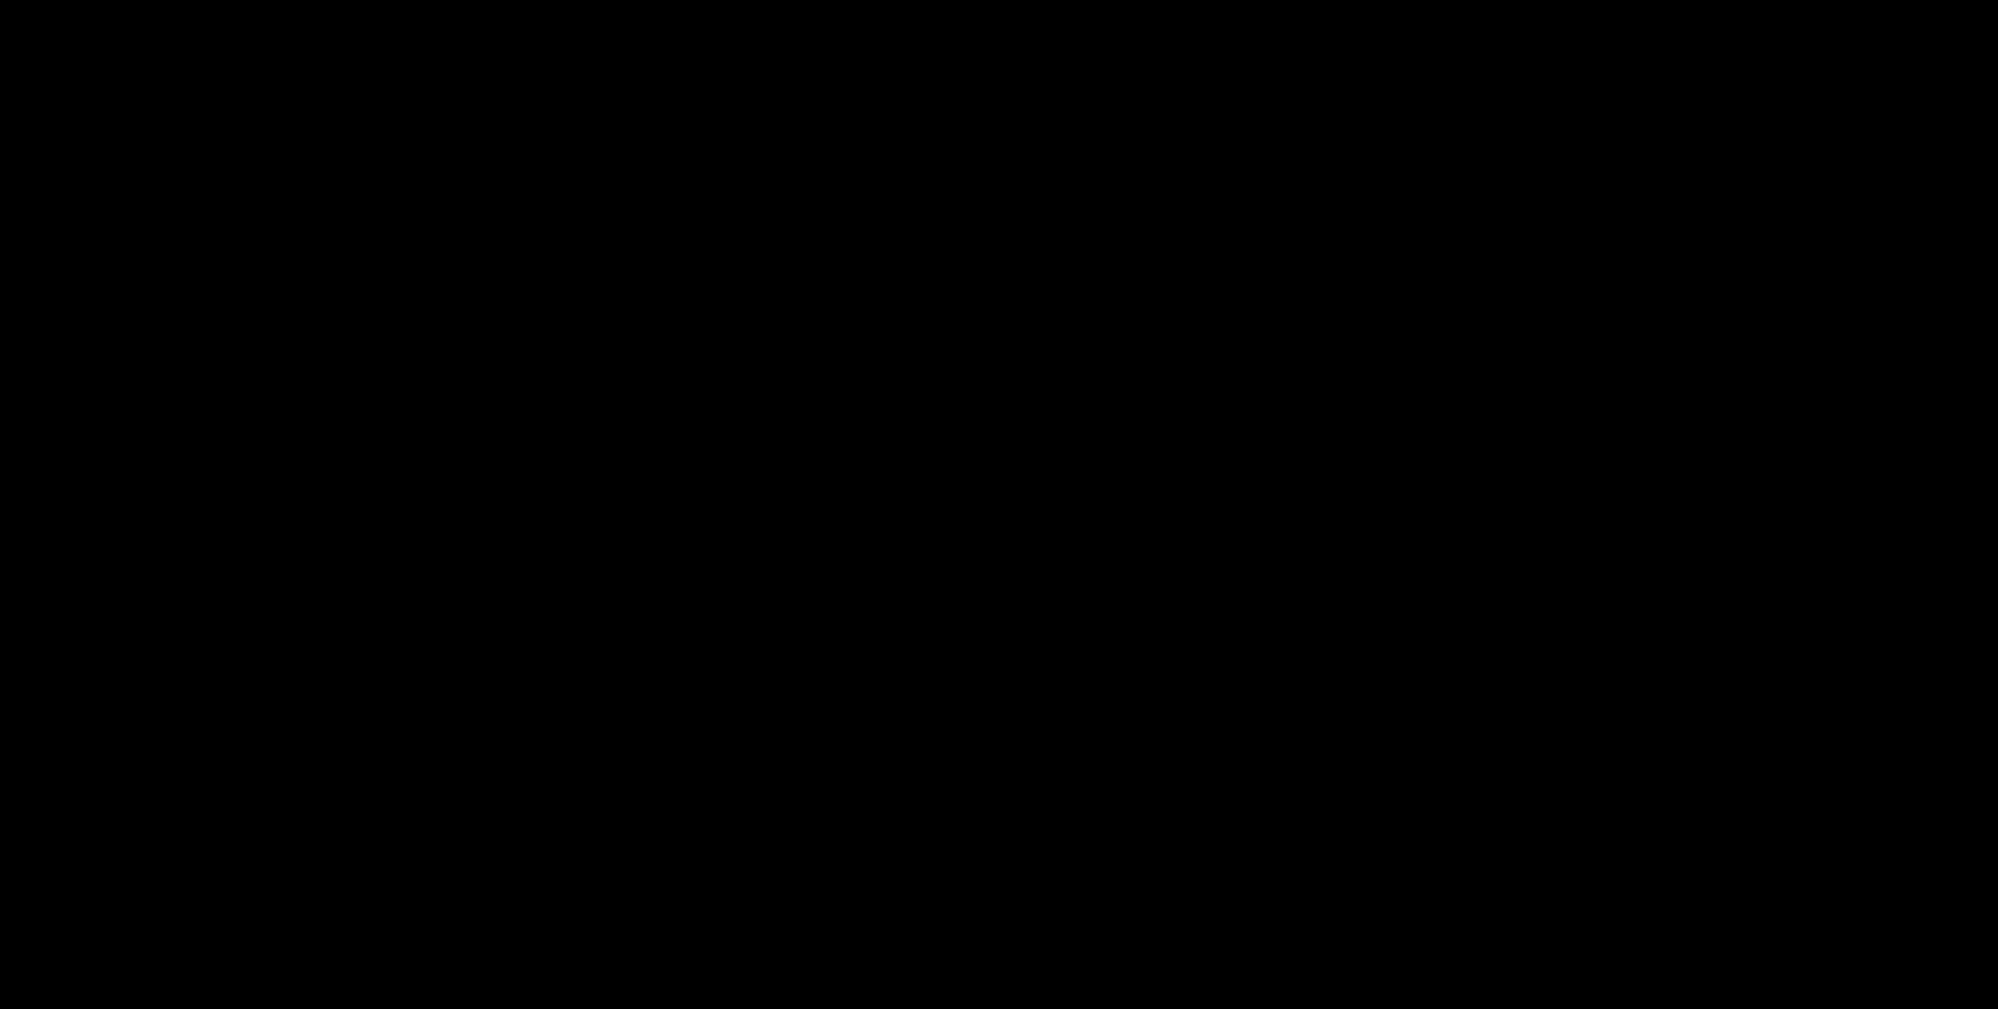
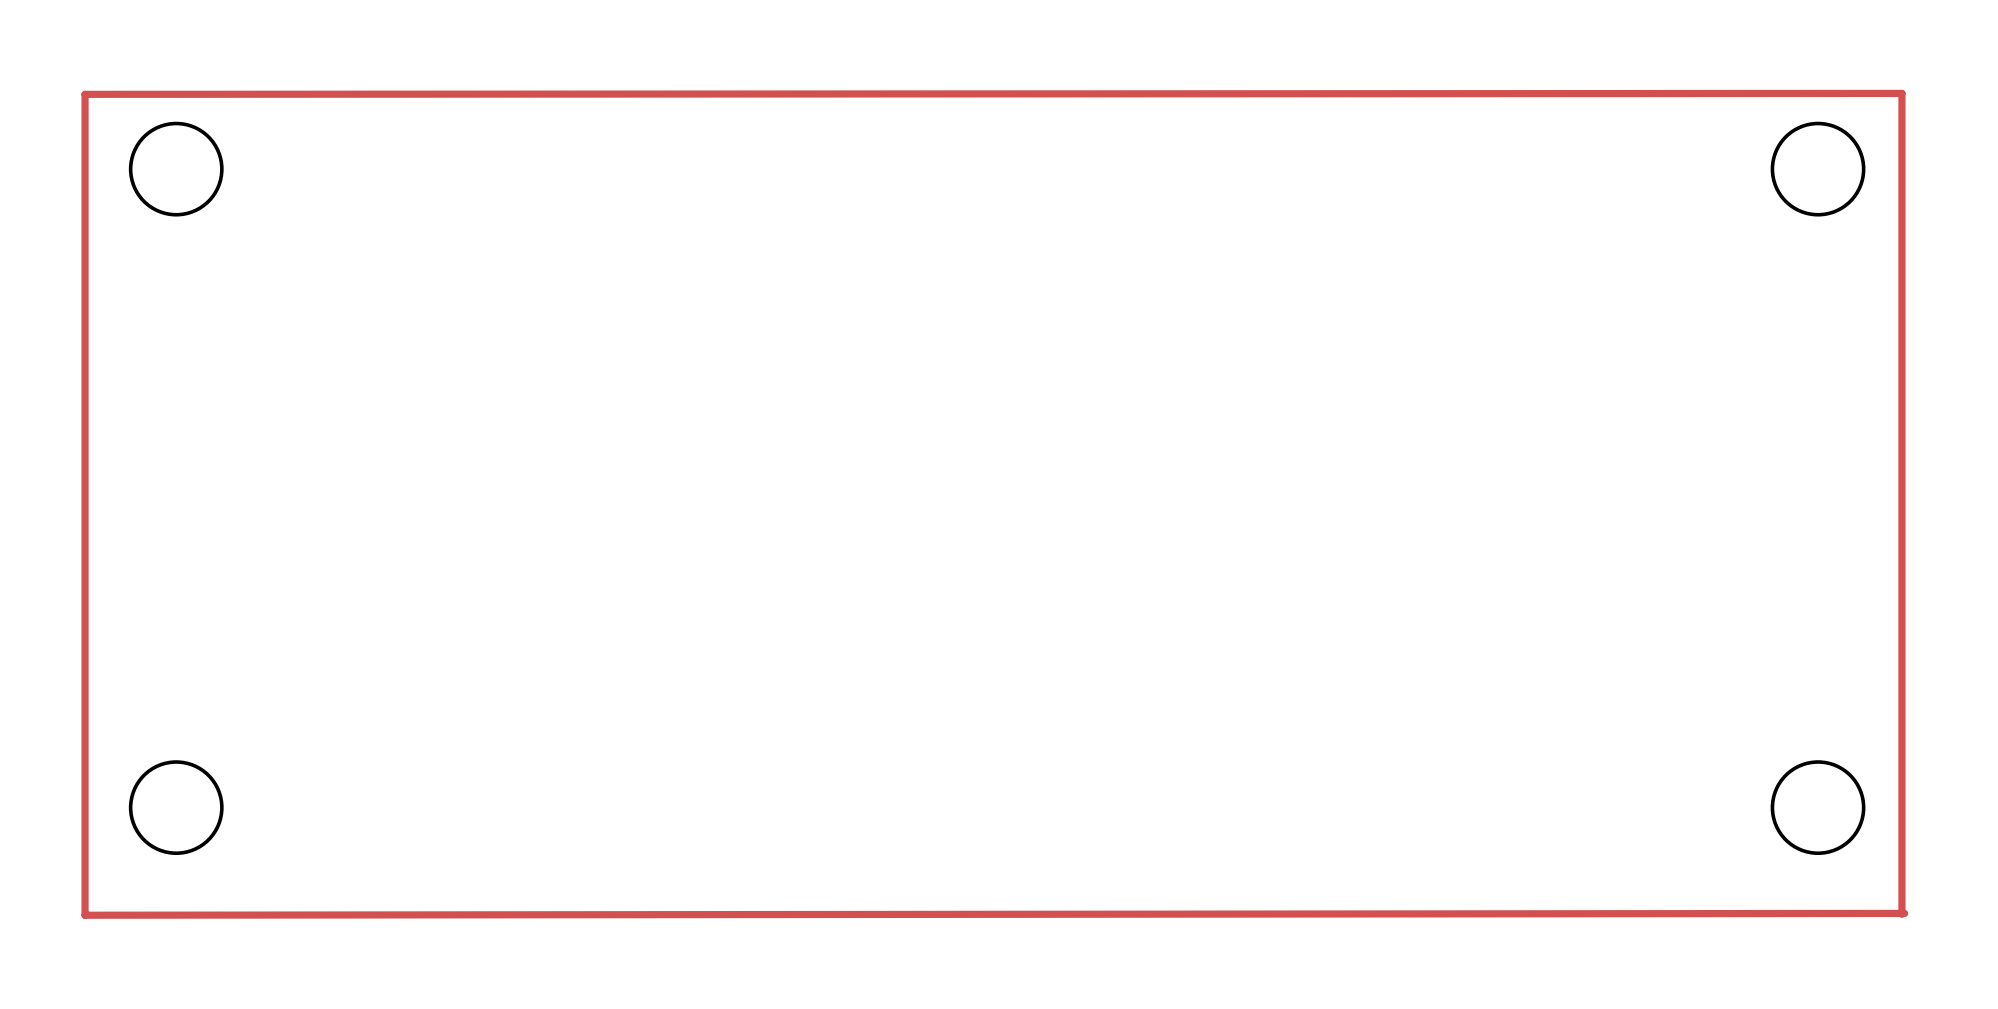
round board edge: none -> [128, 121, 224, 217]
round board edge: none -> [1770, 121, 1866, 217]
round board edge: none -> [128, 760, 224, 856]
round board edge: none -> [1770, 760, 1866, 856]
track: none -> (1904, 913) (85, 915) (85, 94) (1901, 93) (1901, 914)

